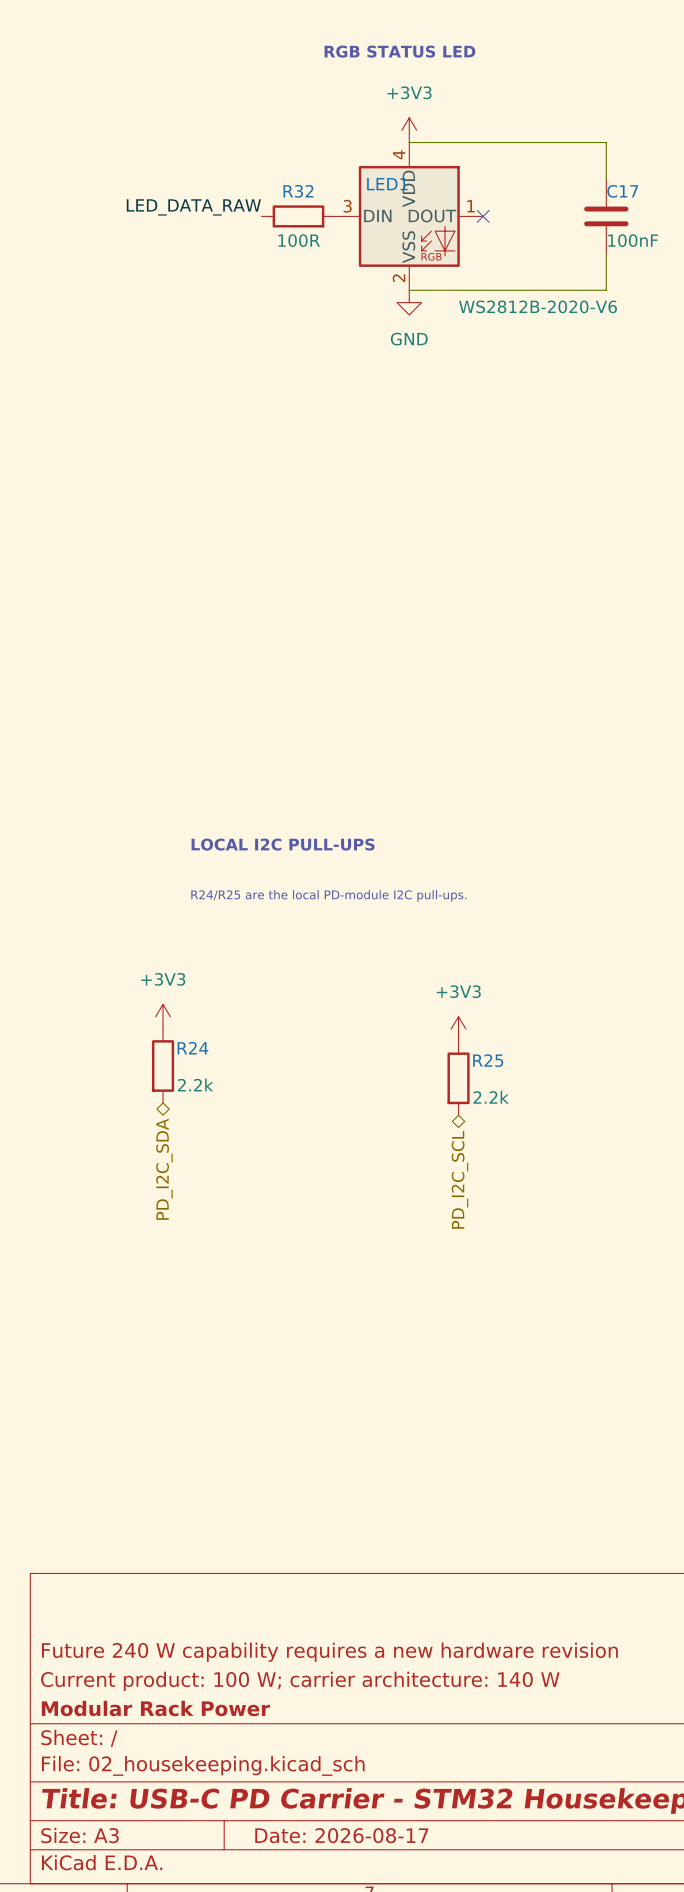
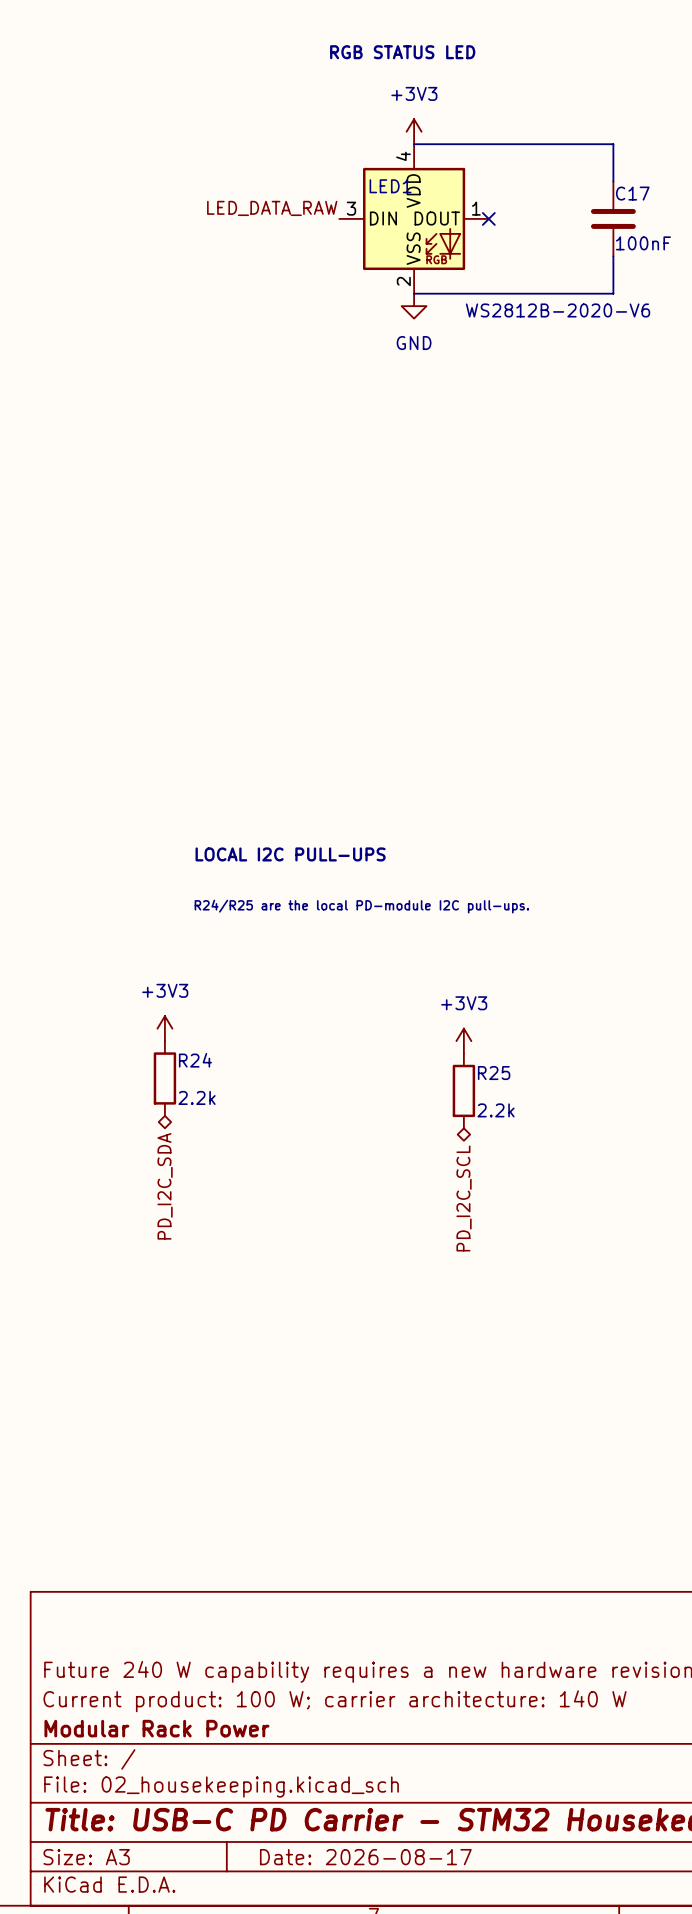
label position: LED_DATA_RAW (193, 207) -> LED_DATA_RAW (272, 208)
R32: 100R (298, 216) -> none

